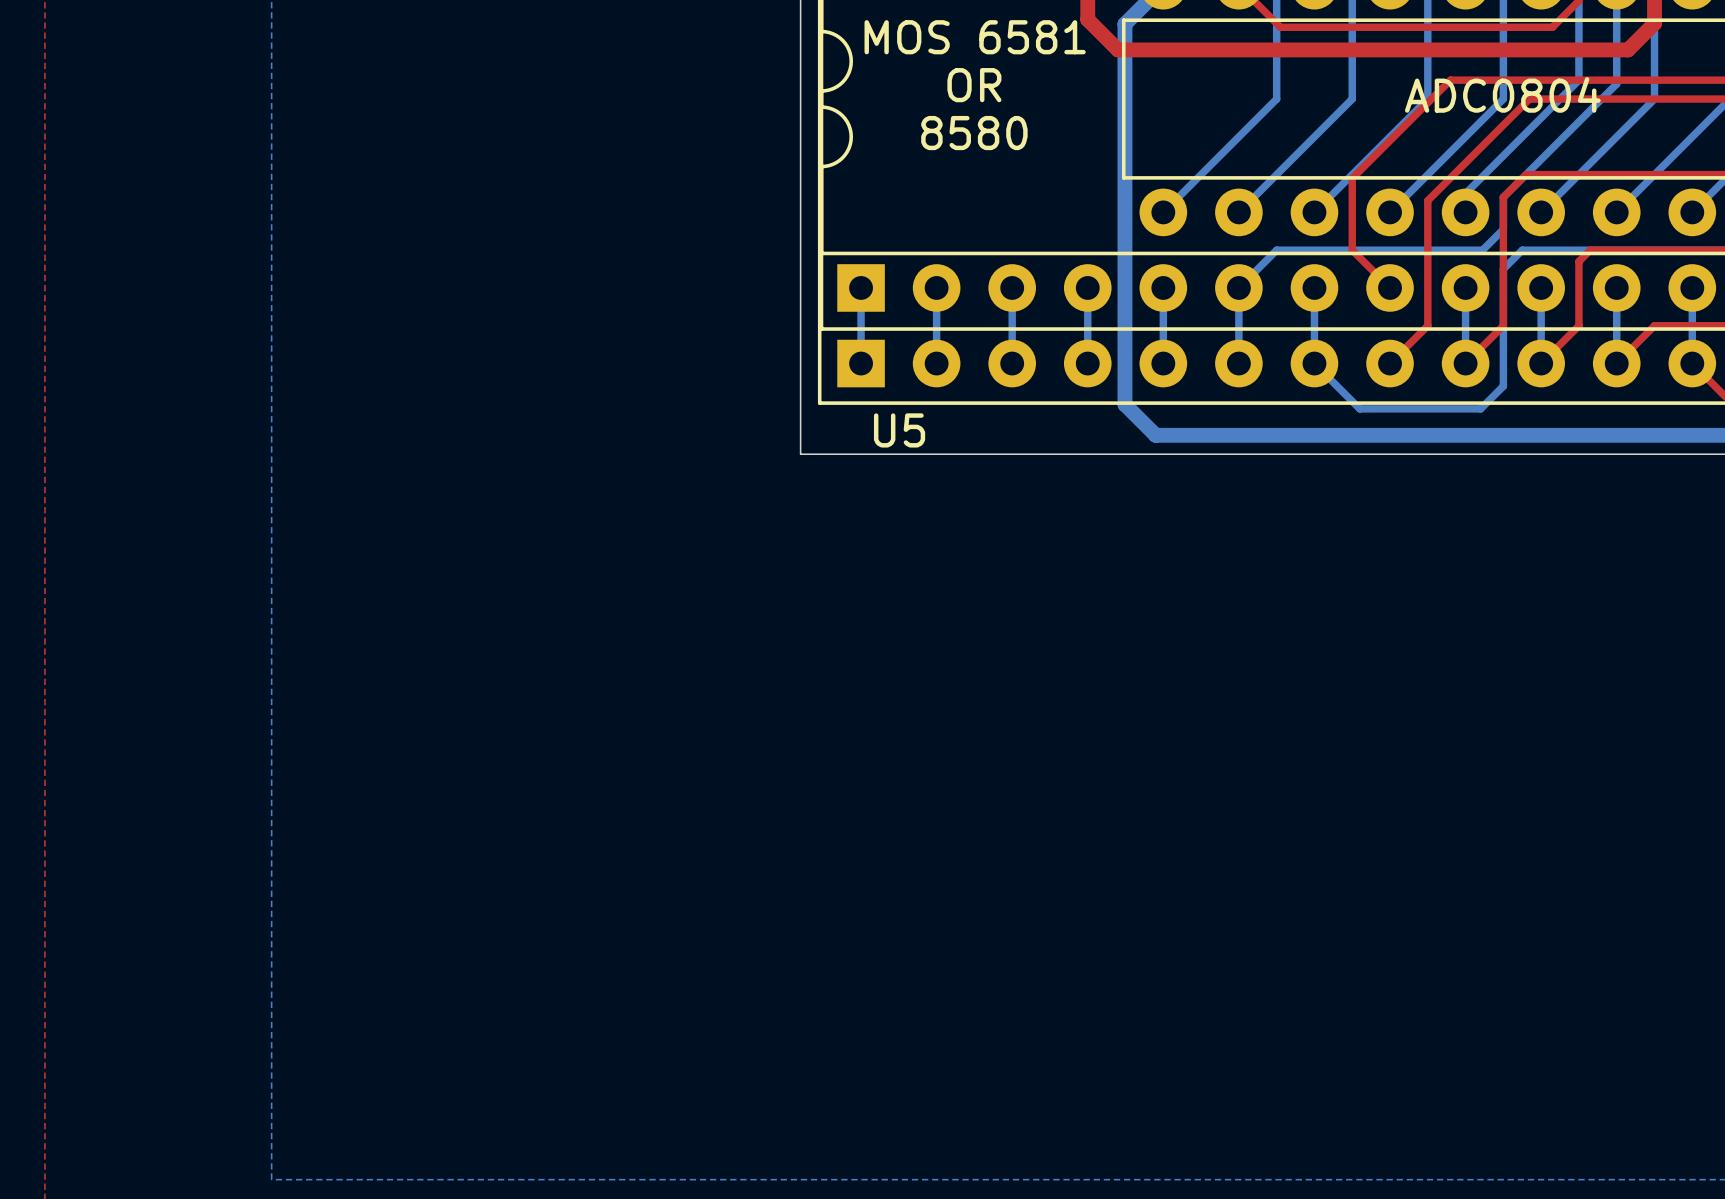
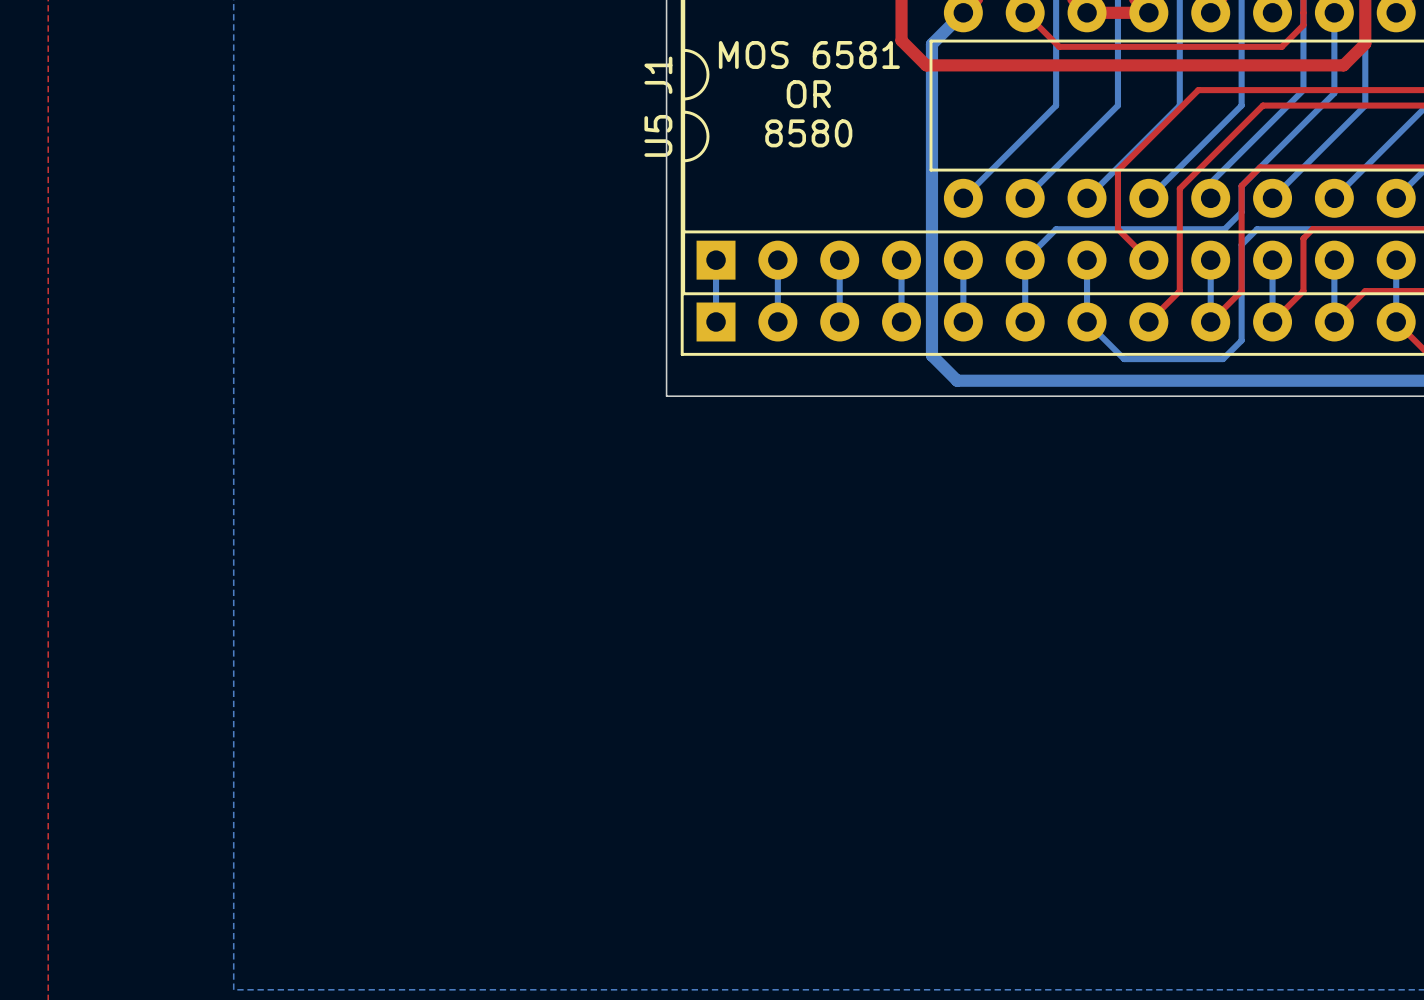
J1 name: none -> J1 (658, 75)
part value: ADC0804 (1502, 94) -> none
U5 name rotation: 0° (899, 430) -> 90° counterclockwise (658, 135)
U5 name position: U5 (899, 430) -> U5 (658, 135)

